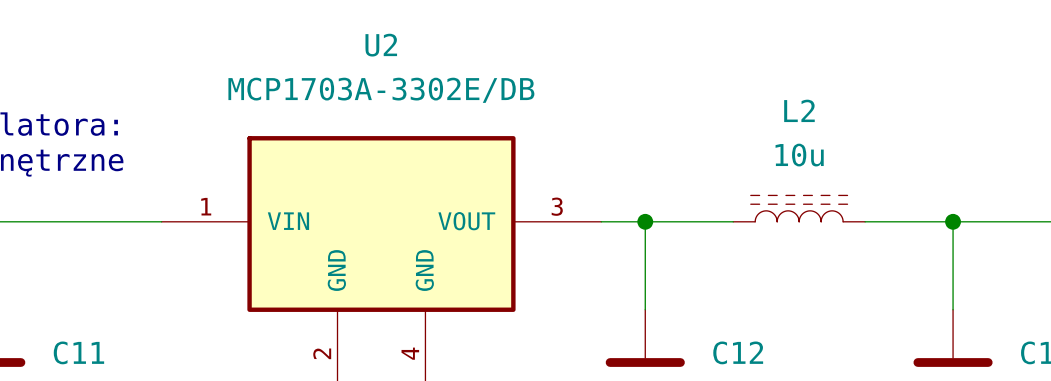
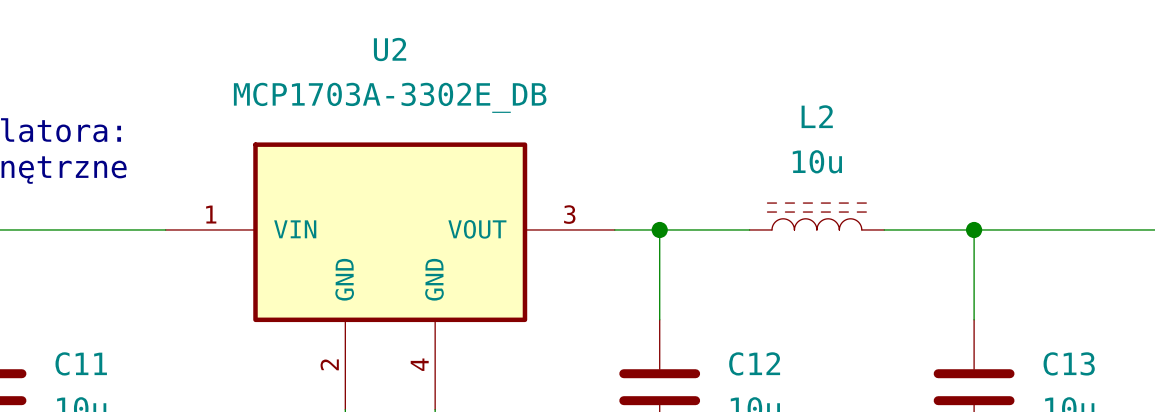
U2 value: MCP1703A-3302E/DB (381, 90) -> MCP1703A-3302E_DB (390, 97)

